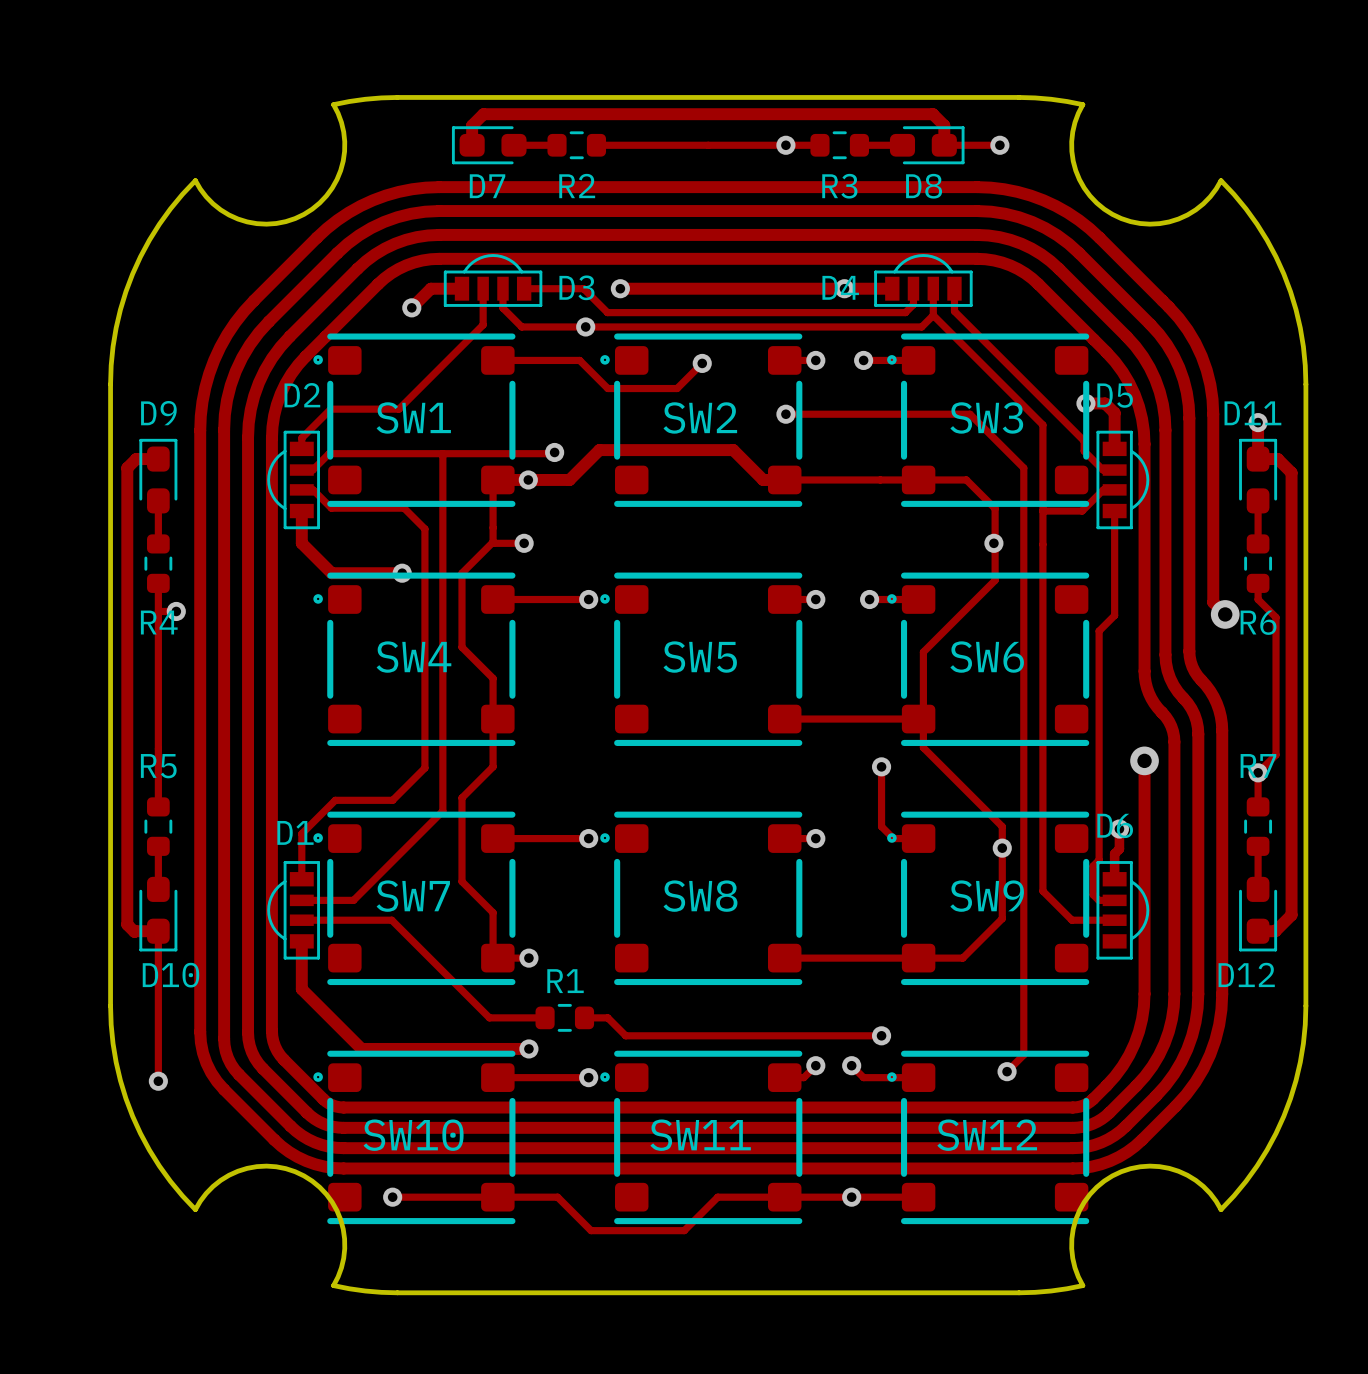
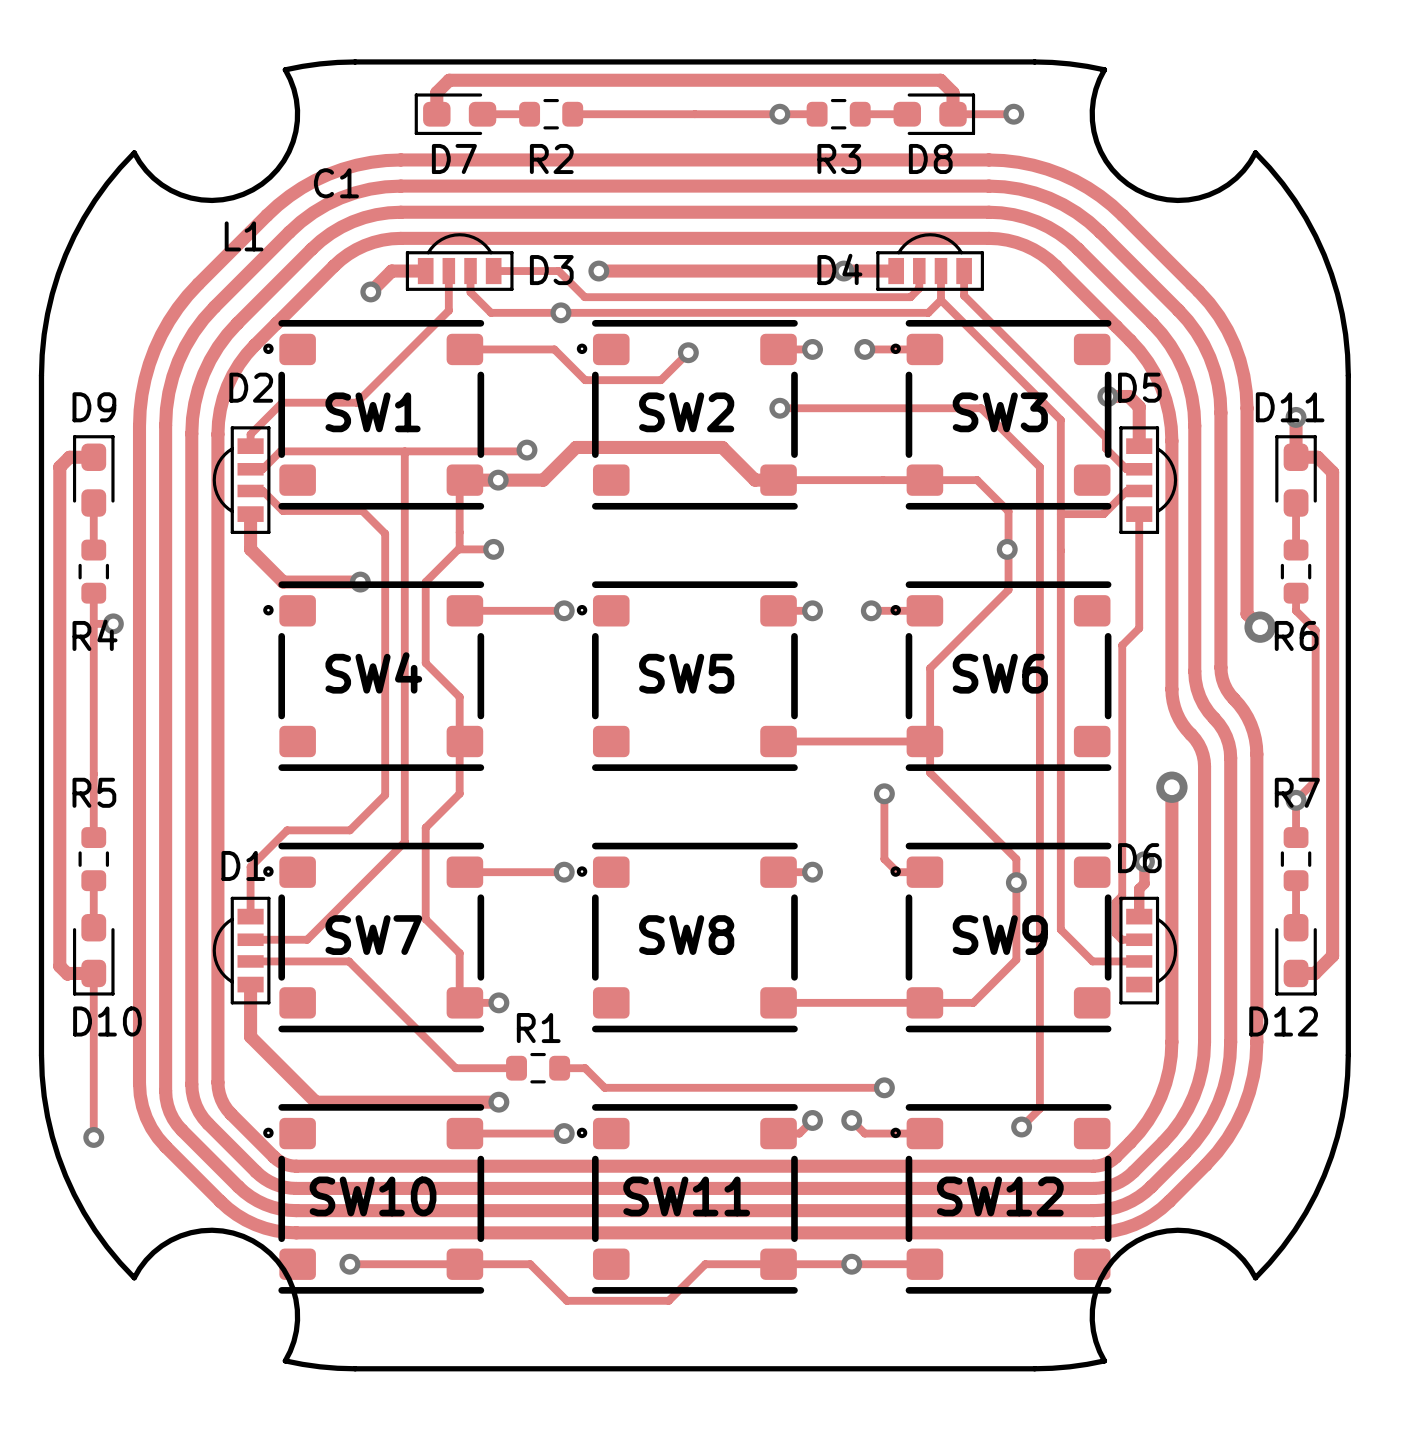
C1: none -> (336, 183)
L1: none -> (244, 236)

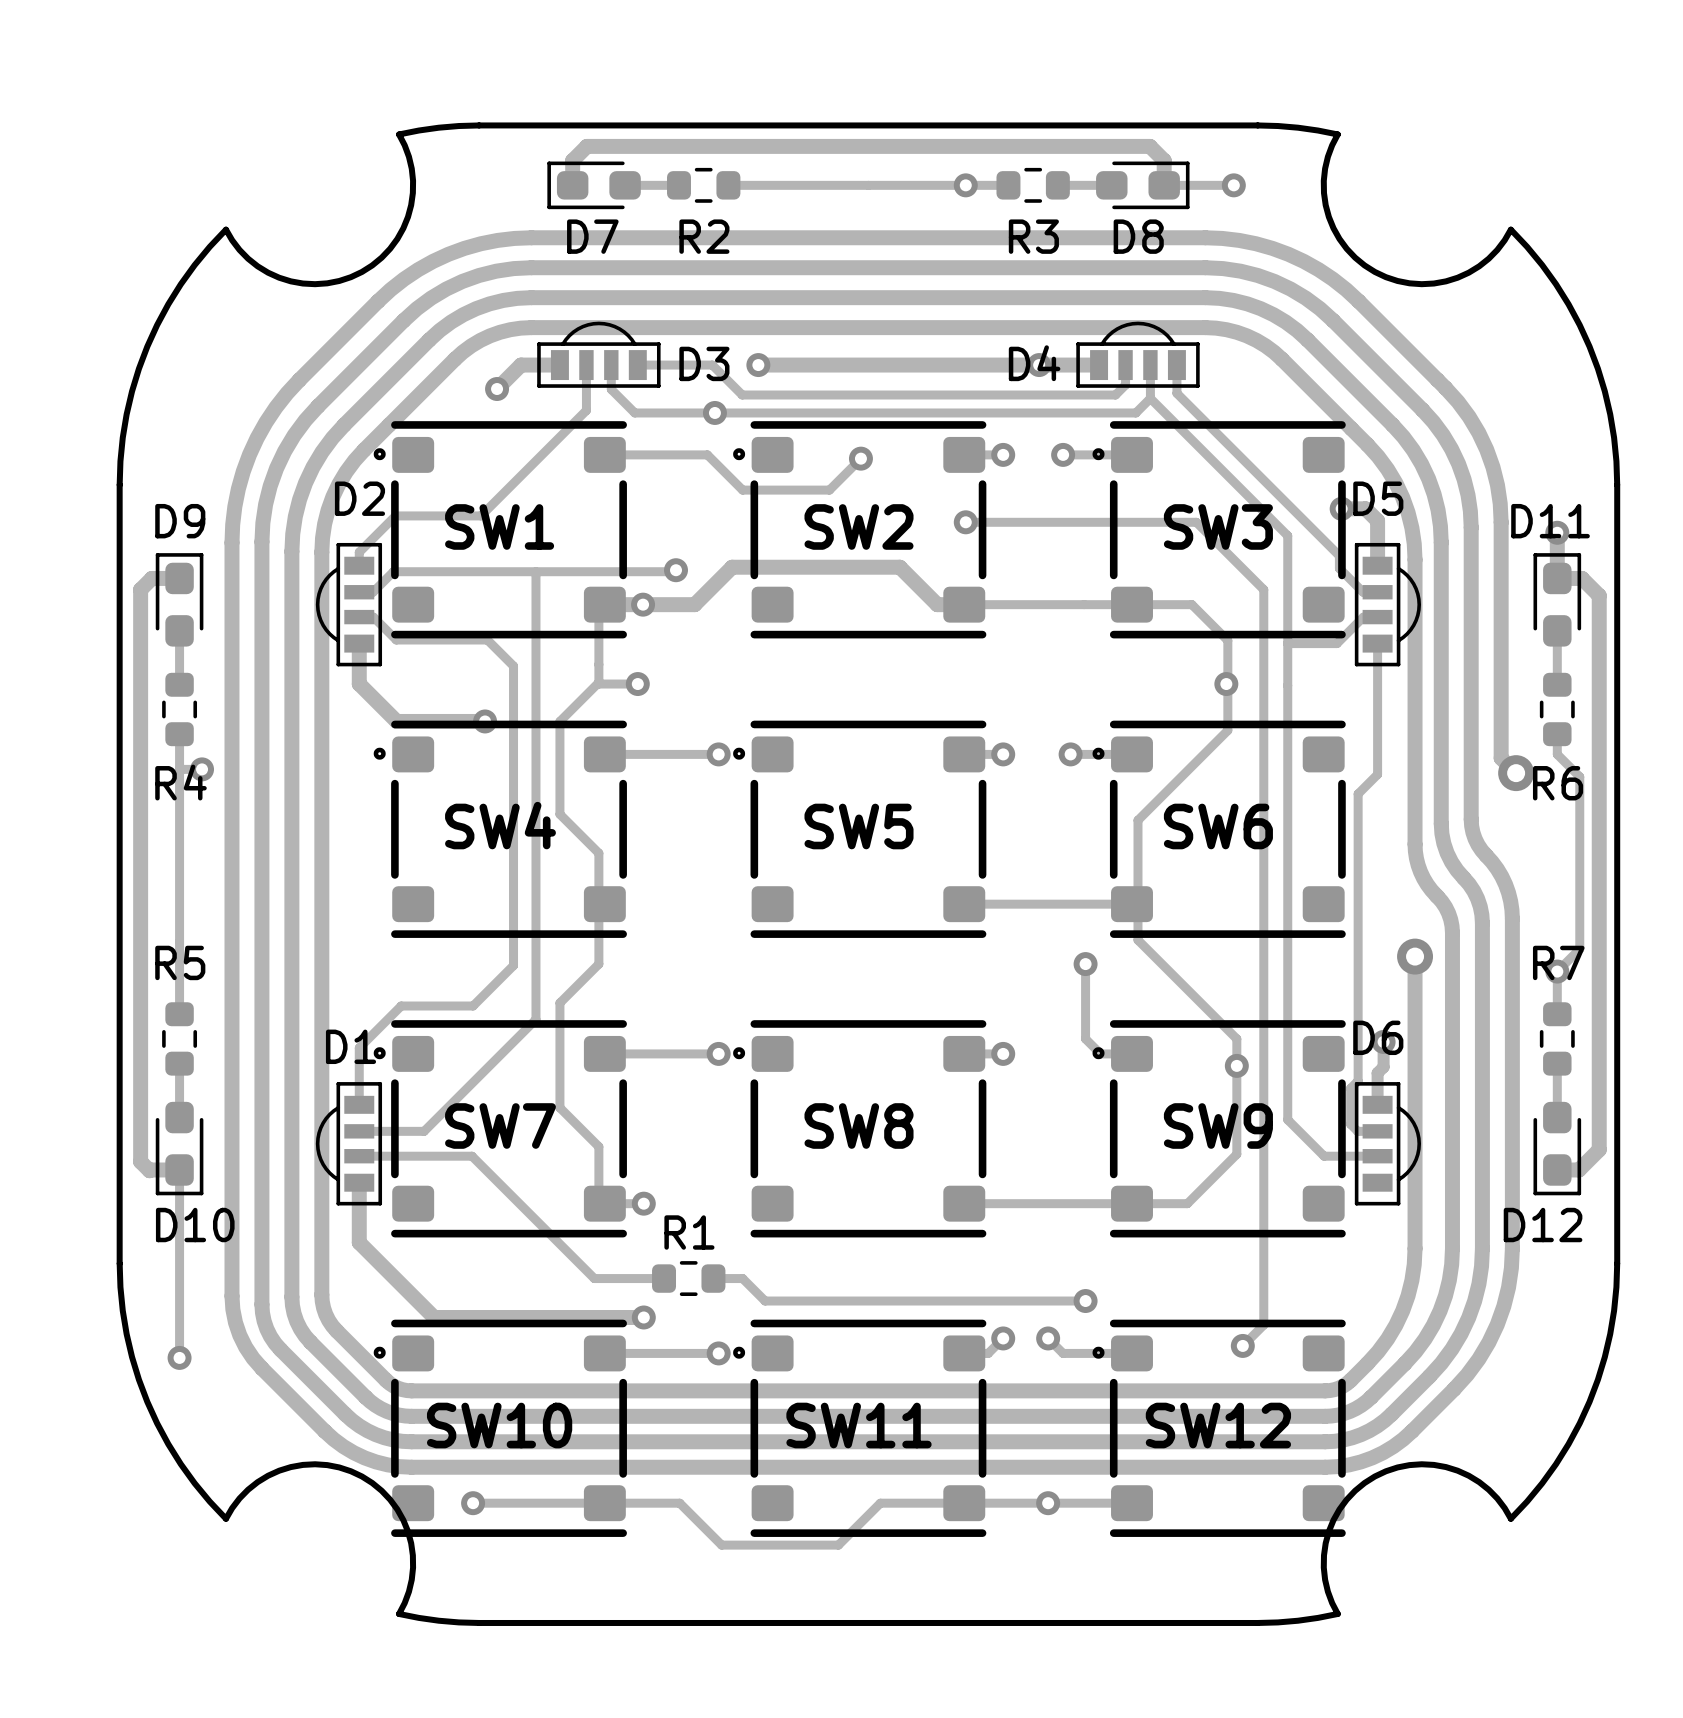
C1: (336, 183) -> none
L1: (244, 236) -> none

